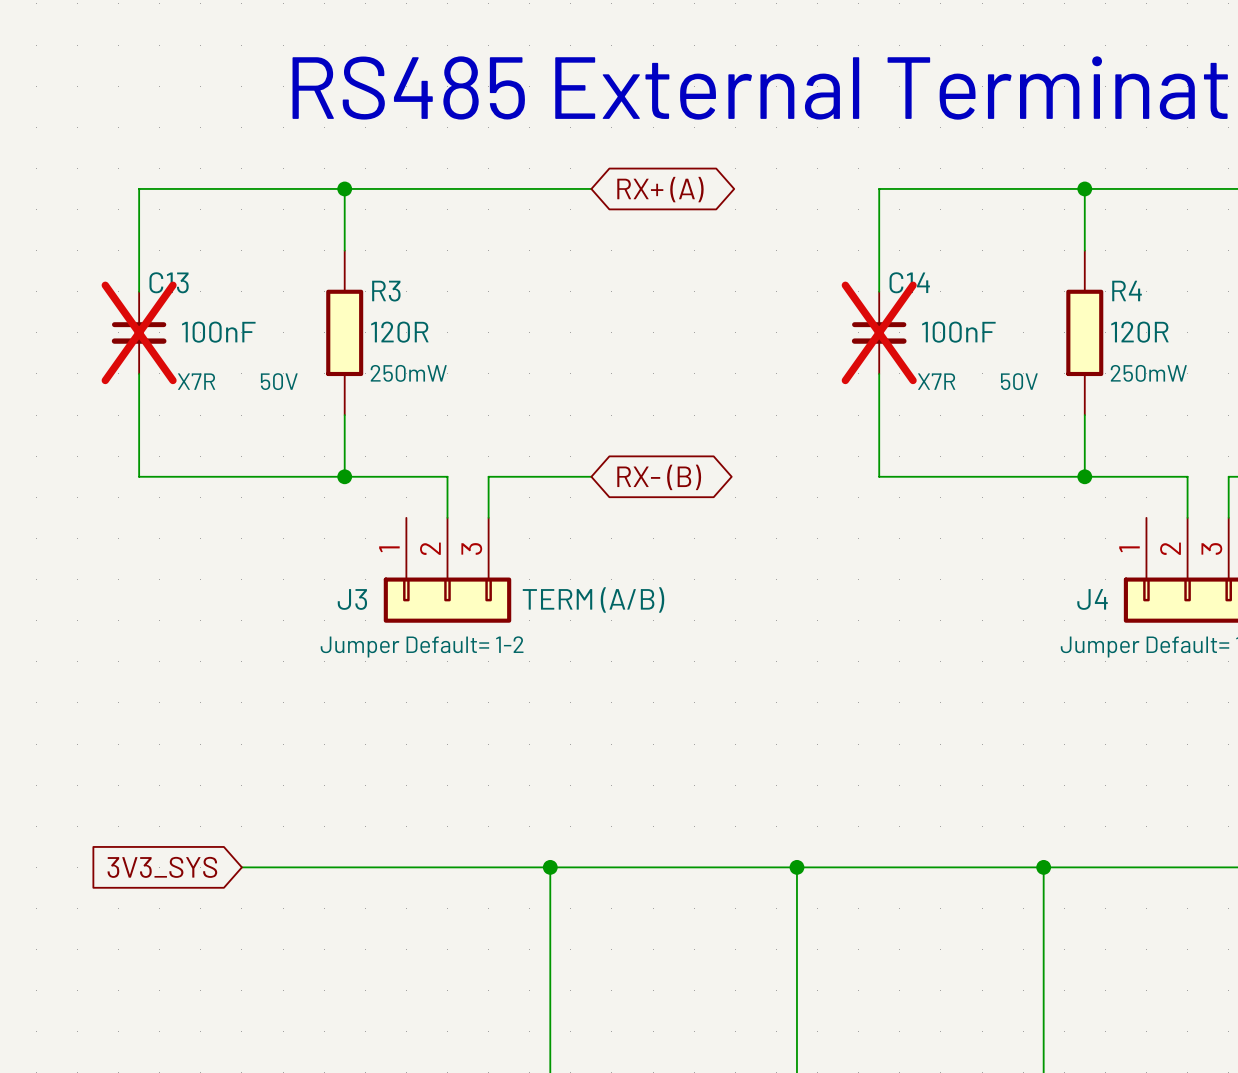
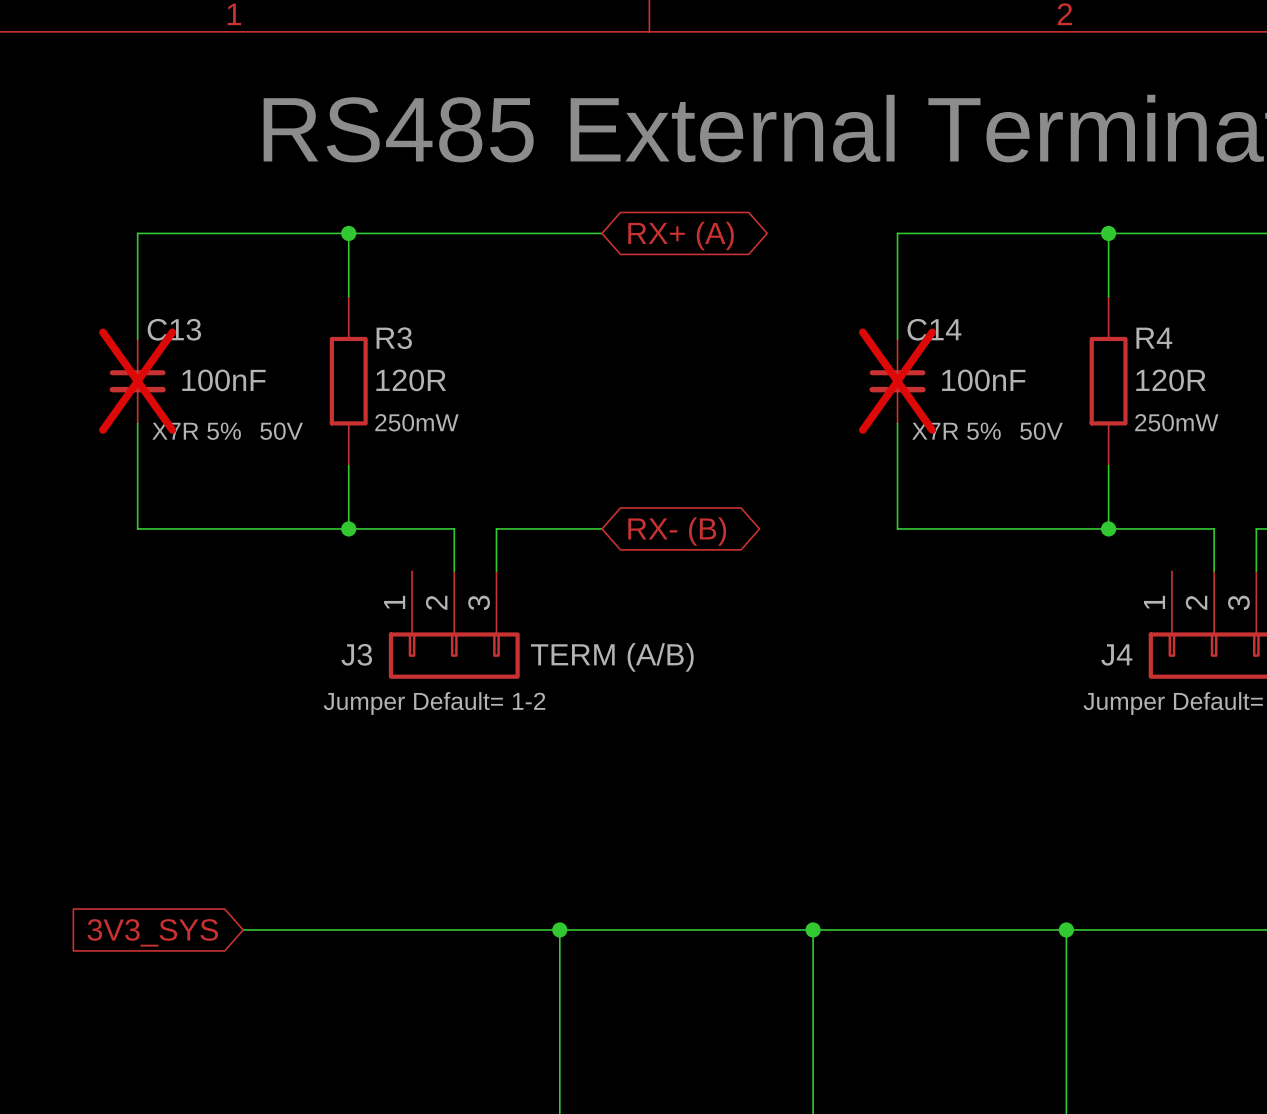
C13 text: X7R (196, 381) -> X7R 5% (196, 431)
C14 text: X7R (936, 381) -> X7R 5% (956, 431)

